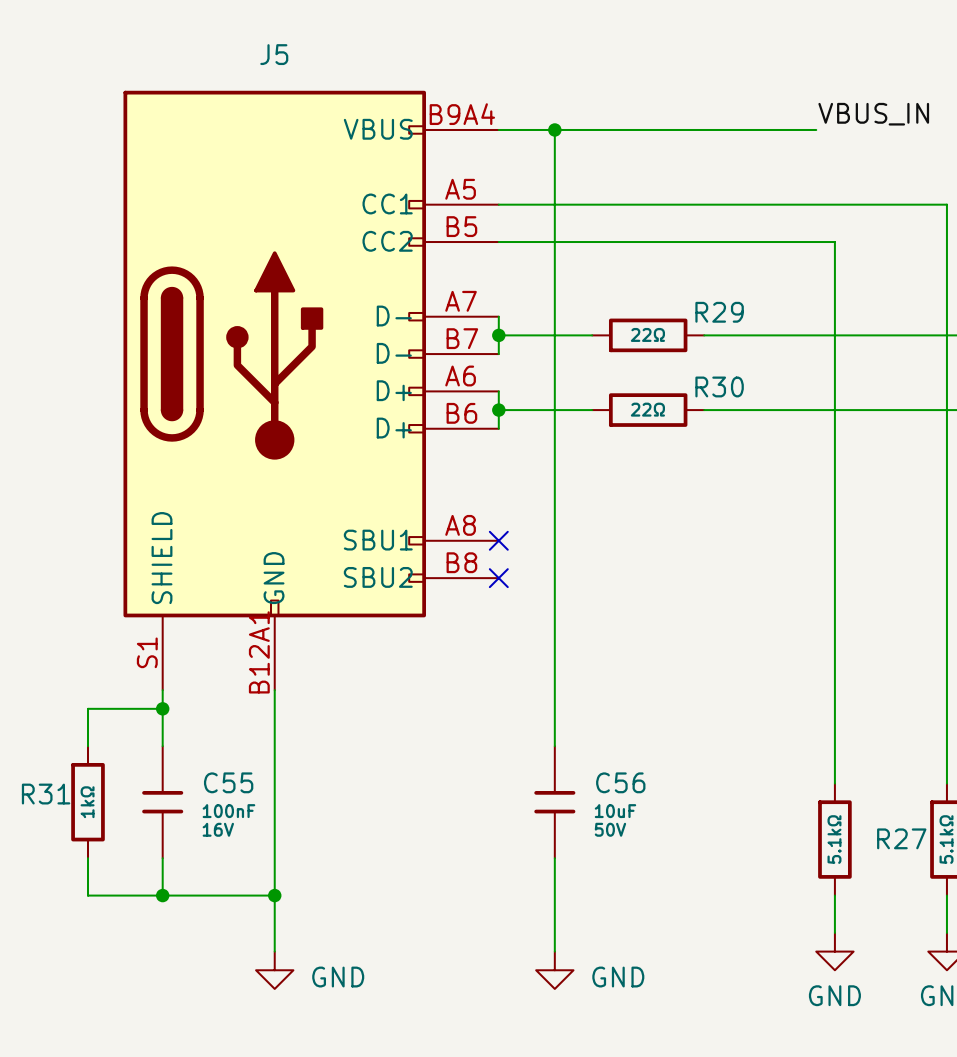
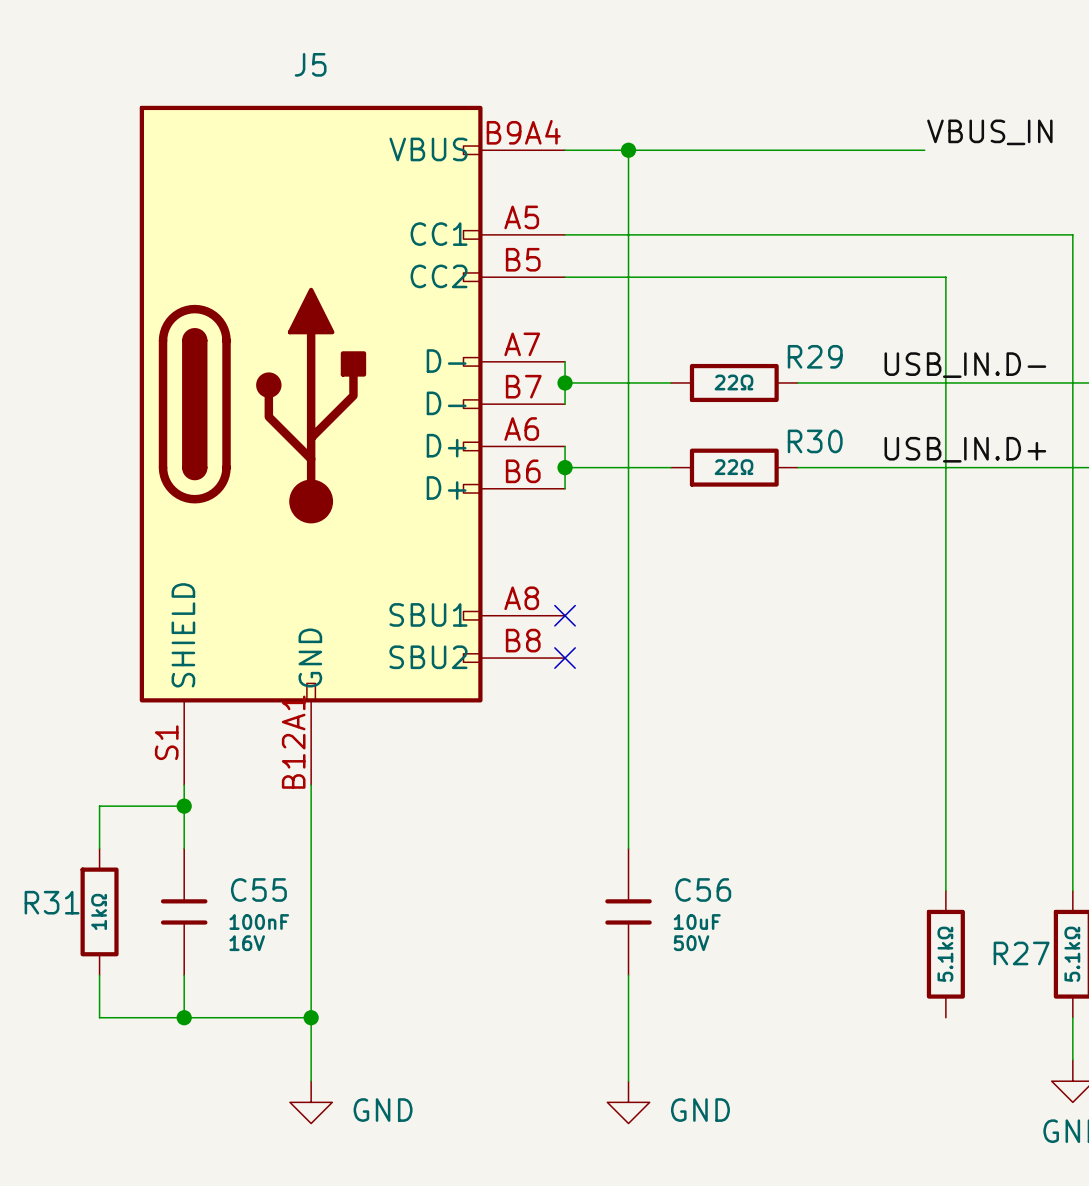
label: none -> USB_IN.D- (965, 365)
label: none -> USB_IN.D+ (965, 449)
wire: (834, 895) (834, 932) -> none
power symbol: GND (834, 951) -> none

